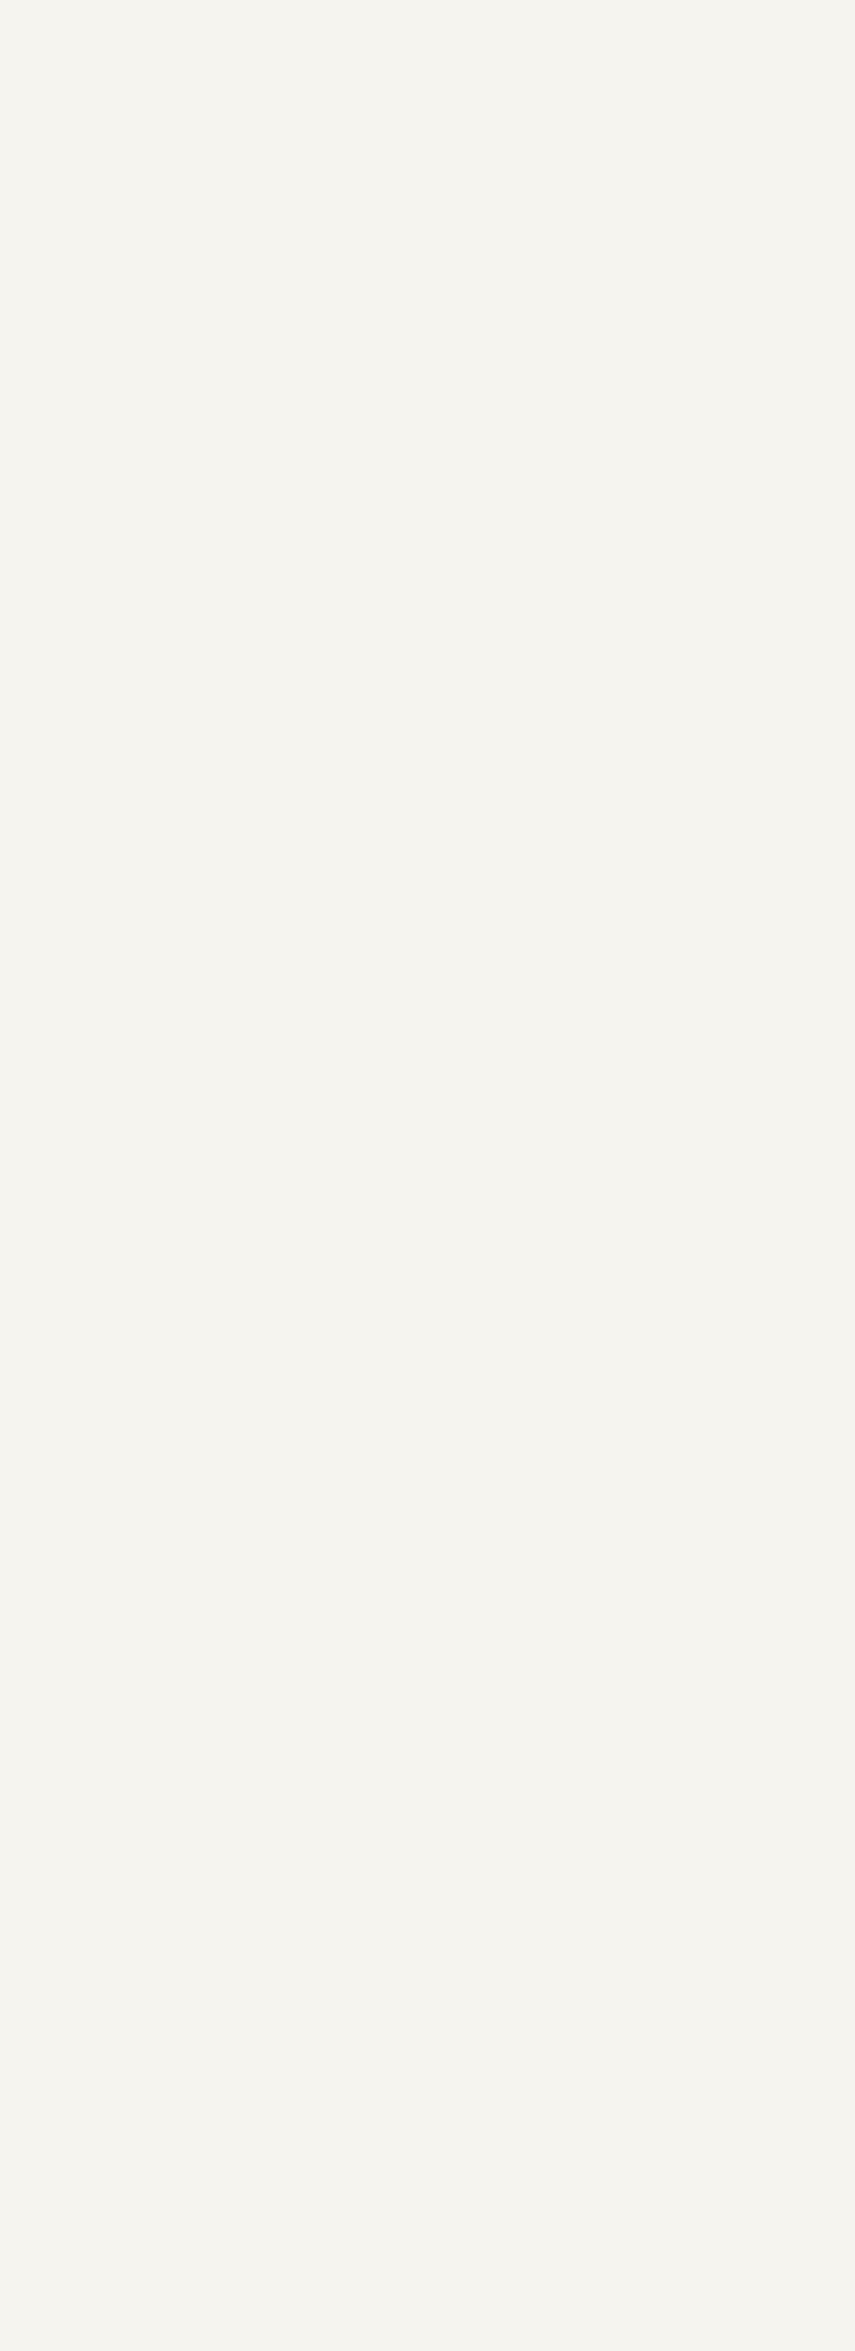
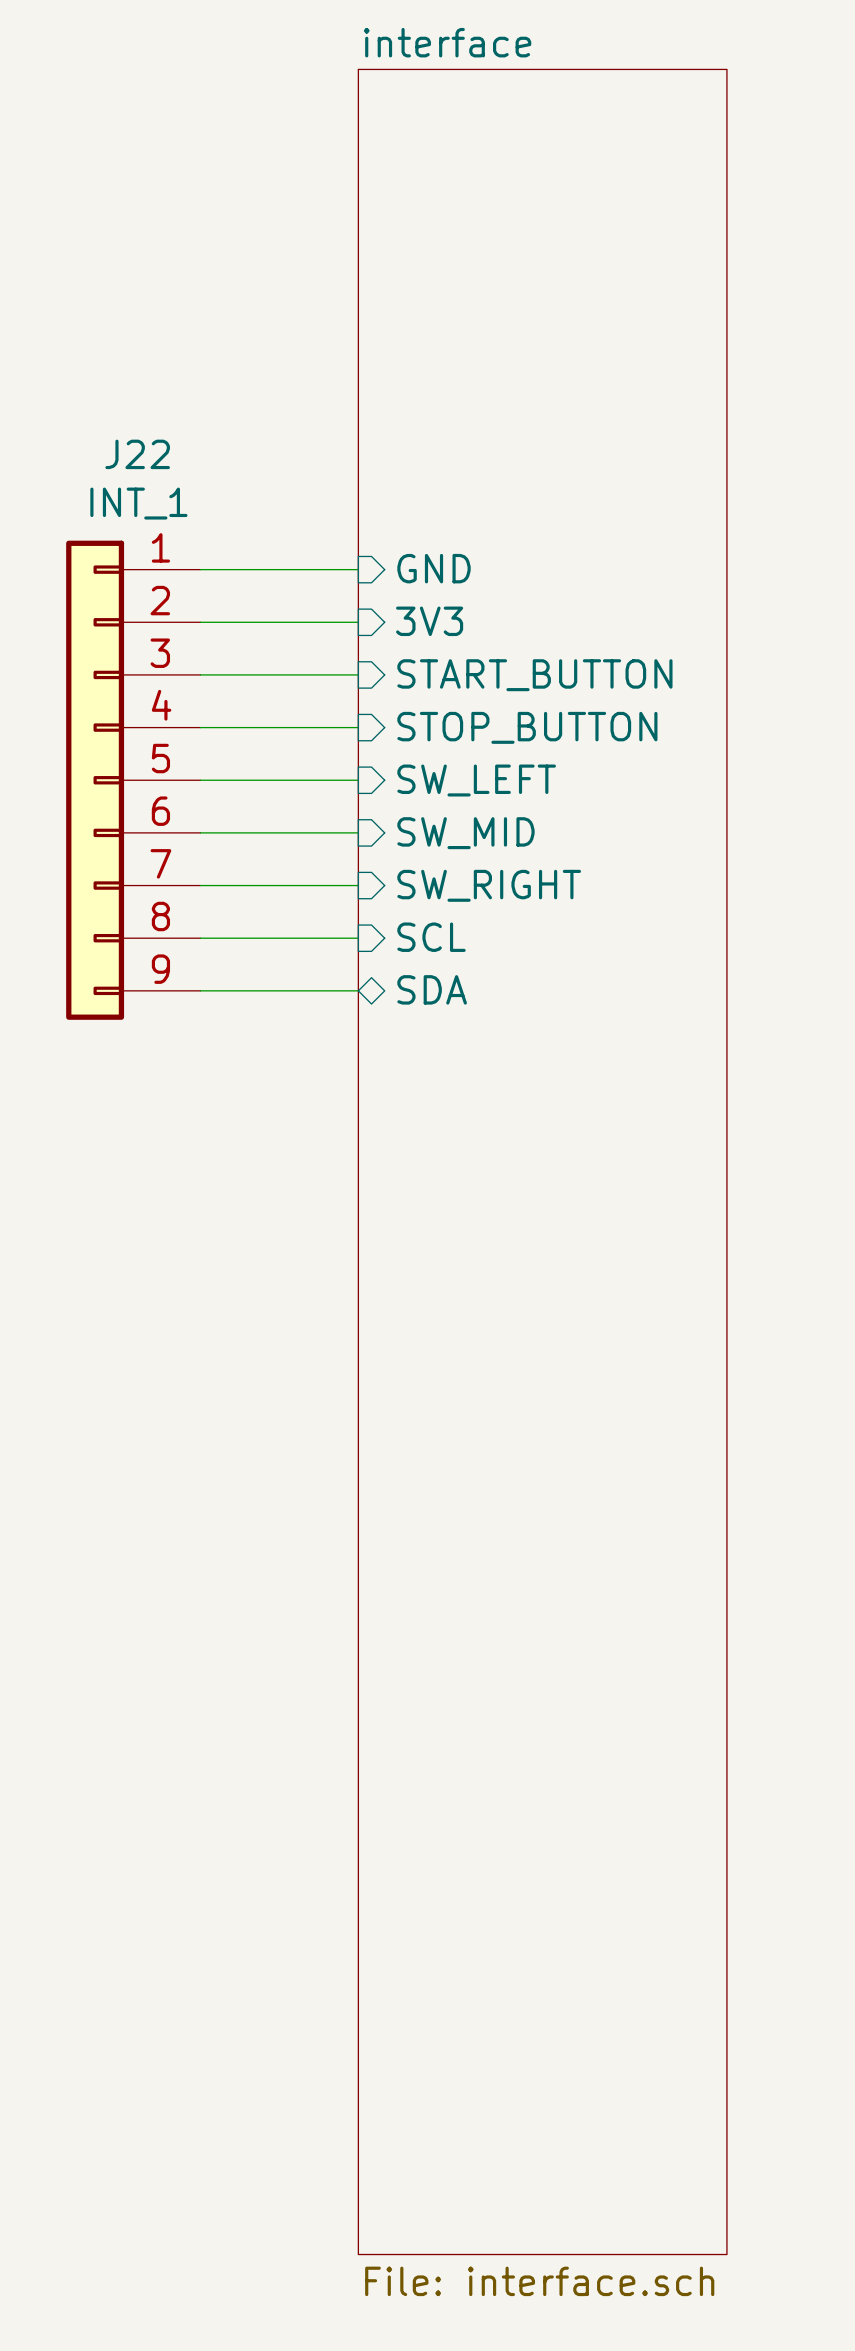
sheet pin: none -> GND (434, 568)
wire: none -> (200, 569) (358, 569)
sheet pin: none -> 3V3 (429, 621)
wire: none -> (200, 622) (358, 622)
wire: none -> (200, 674) (358, 674)
sheet pin: none -> START_BUTTON (534, 675)
wire: none -> (200, 727) (358, 727)
sheet pin: none -> STOP_BUTTON (527, 727)
J22: none -> INT_1 (133, 780)
wire: none -> (200, 780) (358, 780)
sheet pin: none -> SW_LEFT (476, 780)
wire: none -> (200, 832) (358, 832)
sheet pin: none -> SW_MID (465, 833)
wire: none -> (200, 885) (358, 885)
sheet pin: none -> SW_RIGHT (489, 885)
sheet pin: none -> SCL (431, 937)
wire: none -> (200, 938) (358, 938)
sheet pin: none -> SDA (432, 989)
wire: none -> (200, 990) (358, 990)
sheet interface: none -> File: interface.sch (542, 1161)

